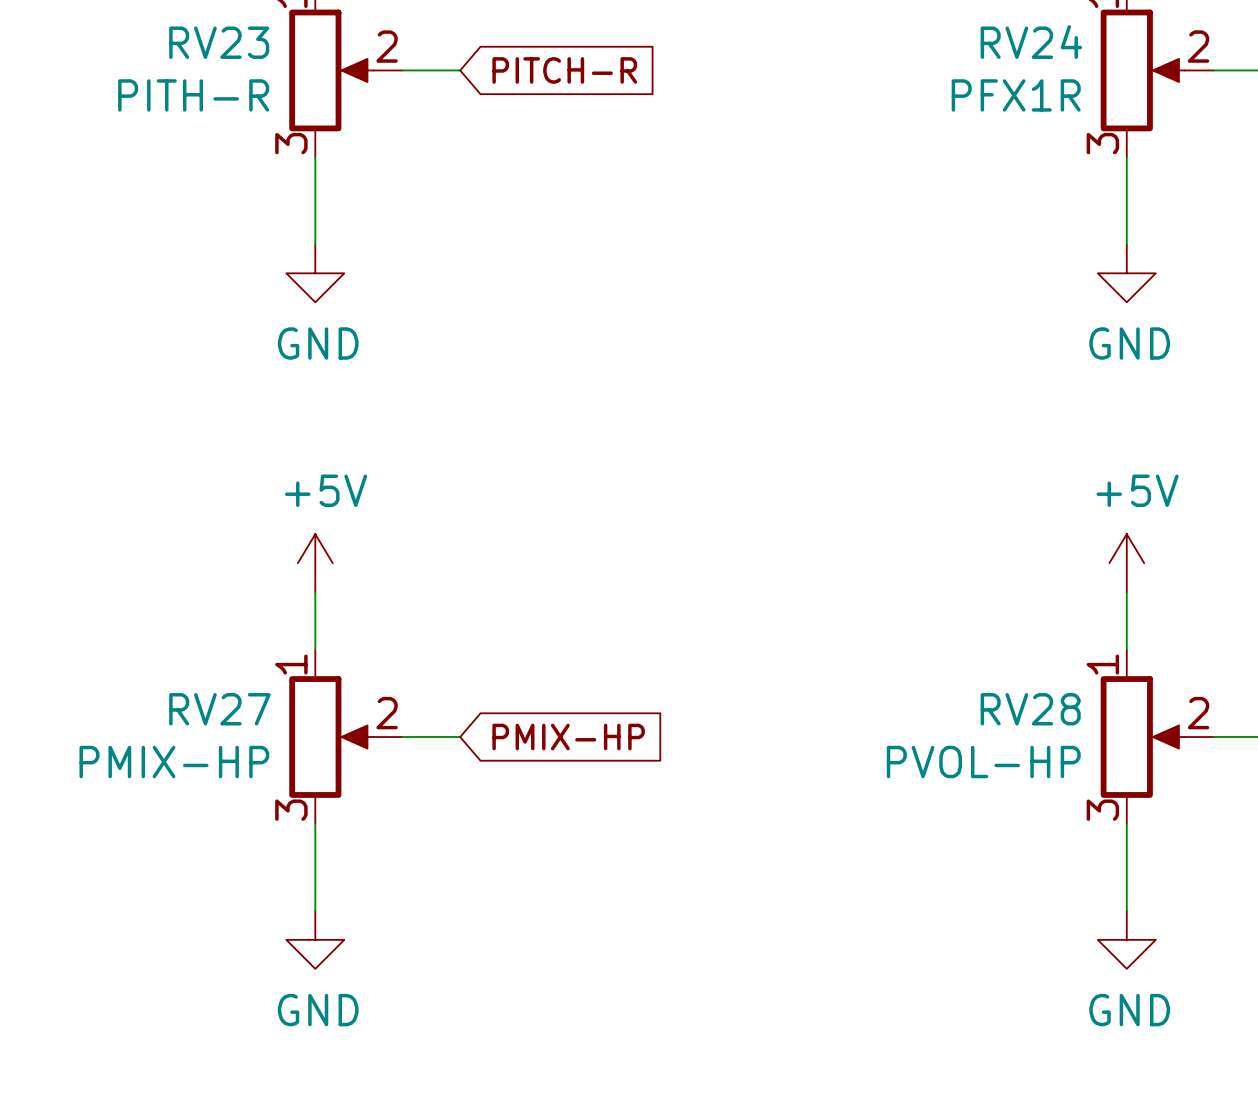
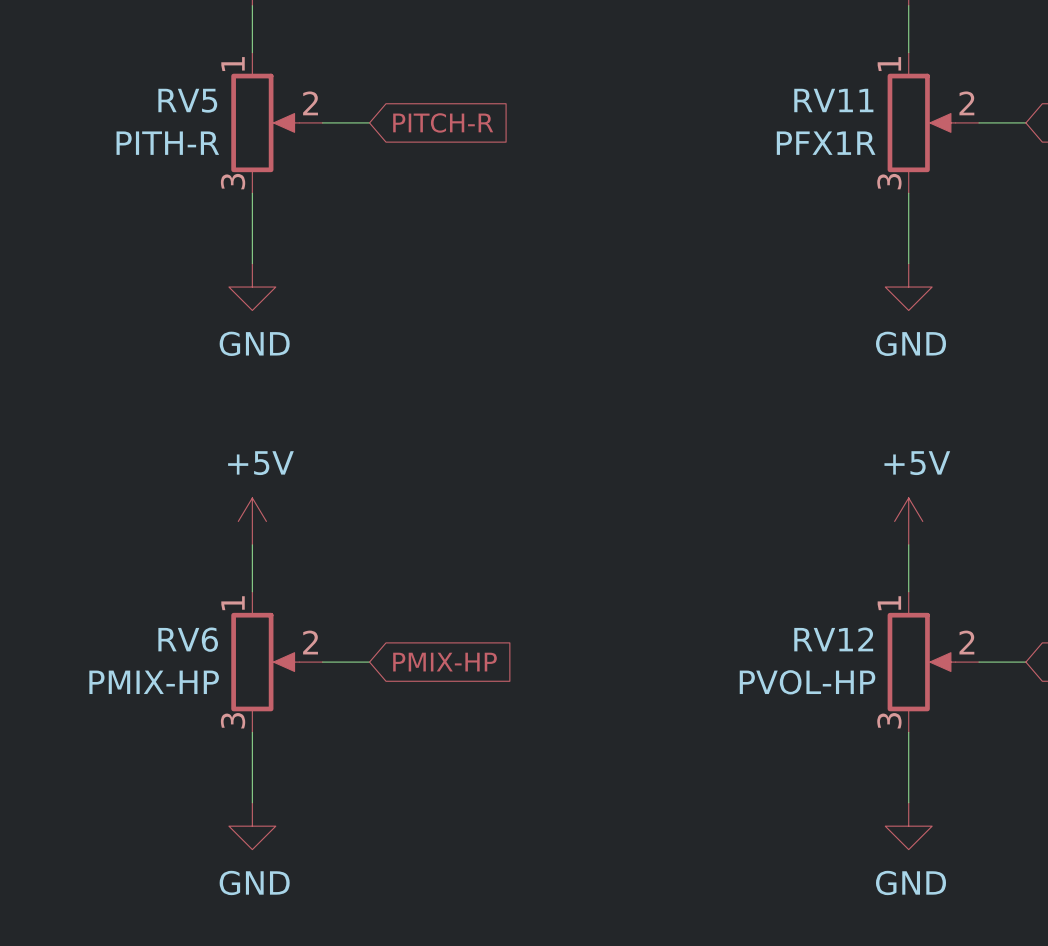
RV23 name: RV23 (219, 42) -> RV5 (187, 100)
RV24 name: RV24 (1031, 42) -> RV11 (833, 100)
RV27 name: RV27 (219, 709) -> RV6 (188, 639)
RV28 name: RV28 (1030, 709) -> RV12 (833, 639)

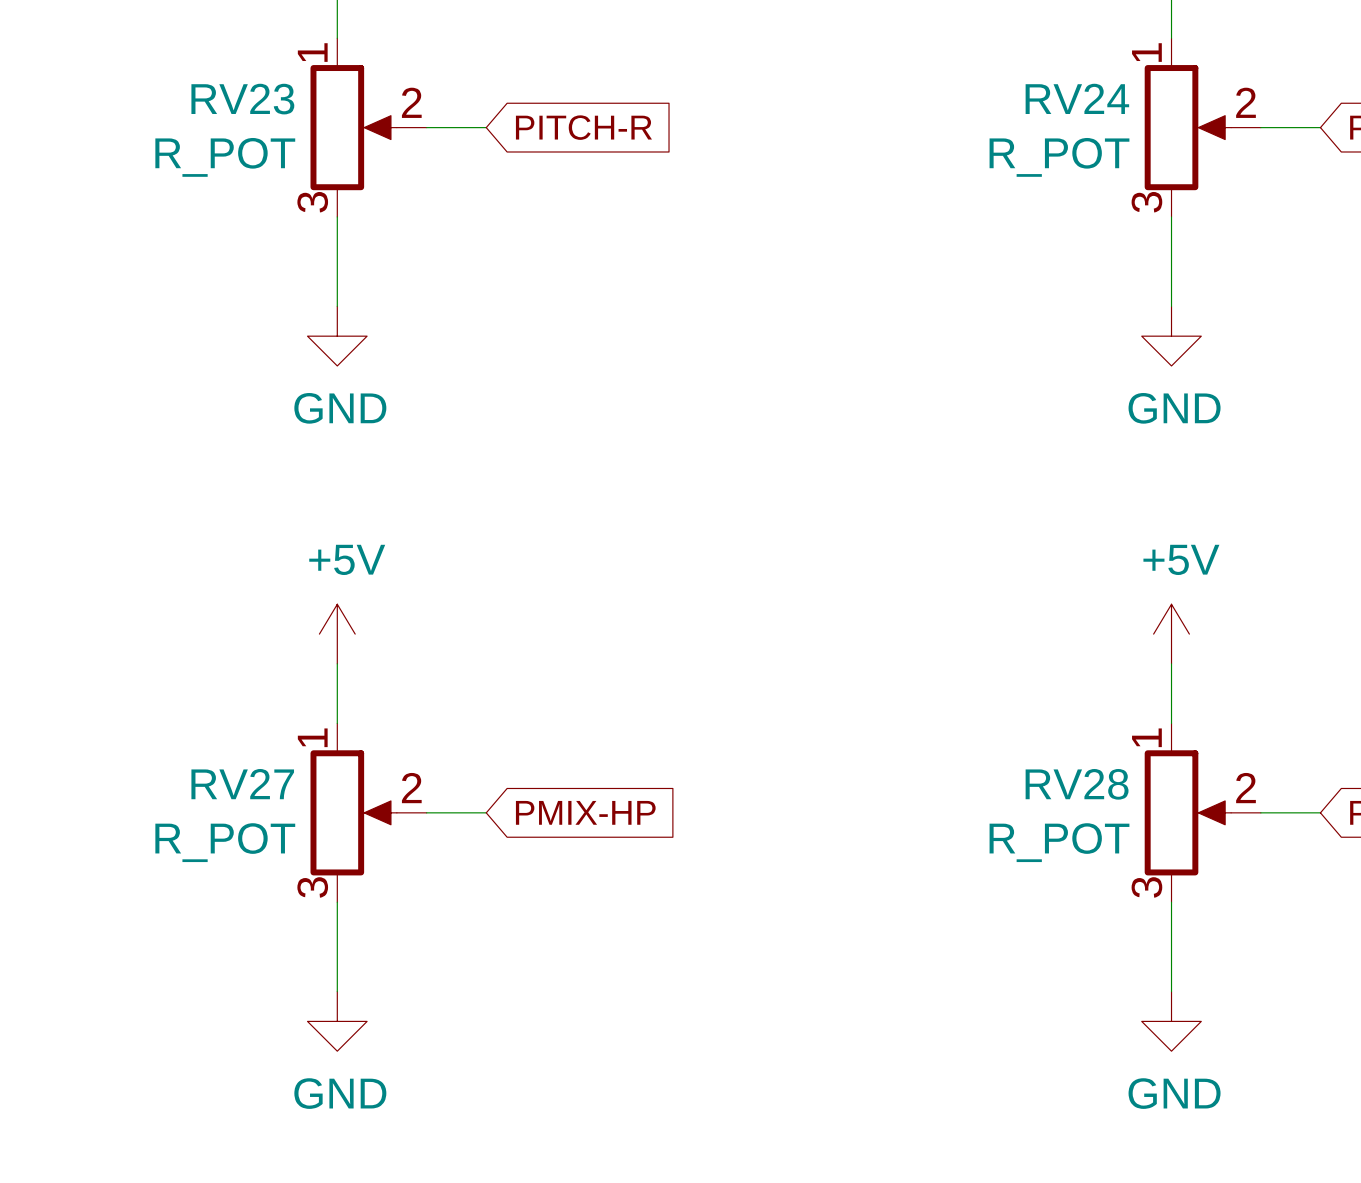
RV5 name: RV5 (187, 100) -> RV23 (242, 99)
RV11 name: RV11 (833, 100) -> RV24 (1077, 98)
RV5 value: PITH-R (167, 143) -> R_POT (225, 157)
RV11 value: PFX1R (826, 143) -> R_POT (1059, 157)
RV6 name: RV6 (188, 639) -> RV27 (242, 784)
RV12 name: RV12 (833, 639) -> RV28 (1077, 784)
RV6 value: PMIX-HP (154, 682) -> R_POT (225, 842)
RV12 value: PVOL-HP (807, 682) -> R_POT (1059, 842)

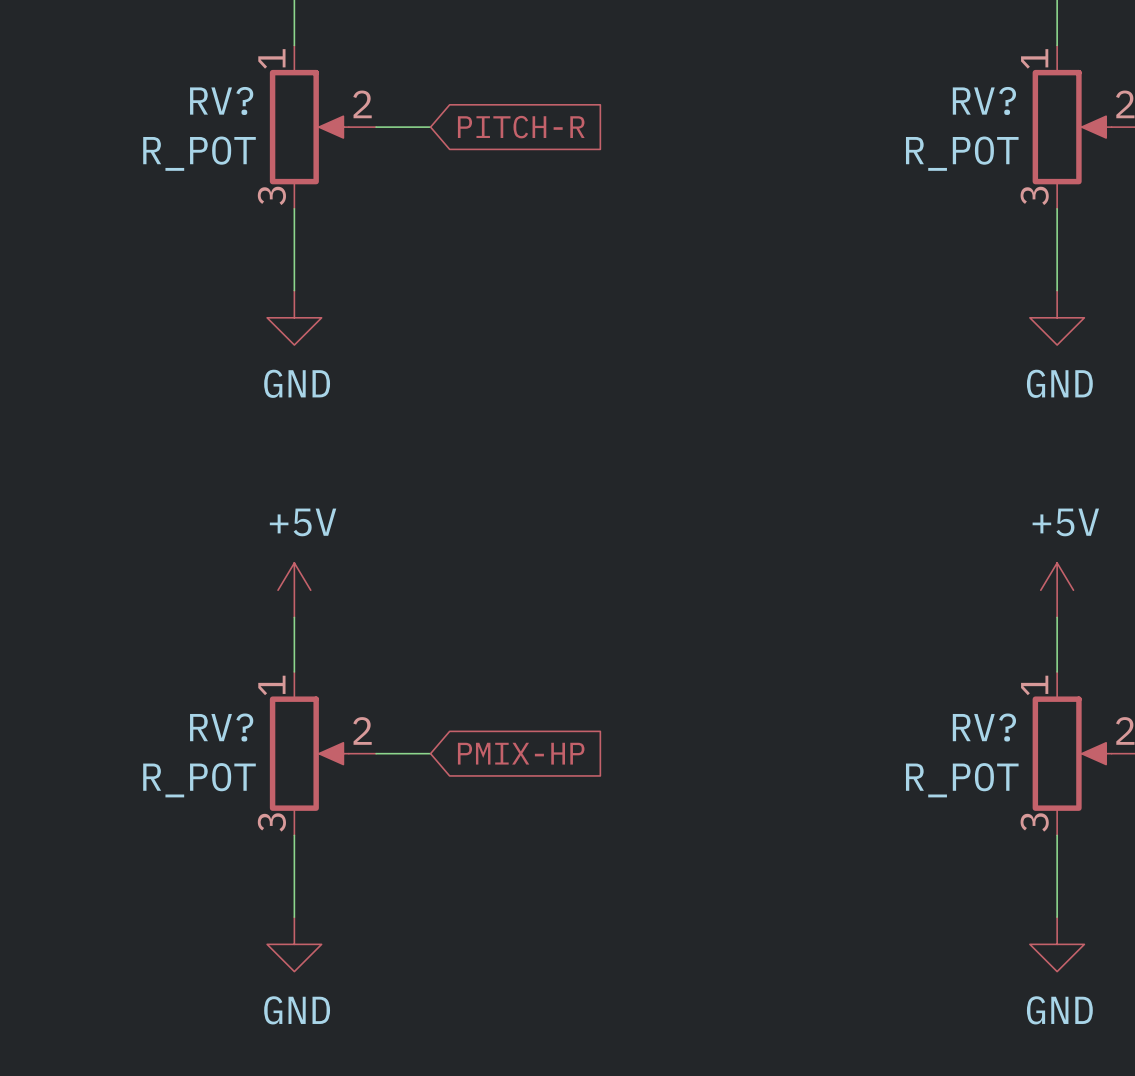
RV24 name: RV24 (1077, 98) -> RV? (984, 100)
RV23 name: RV23 (242, 99) -> RV? (221, 100)
RV27 name: RV27 (242, 784) -> RV? (221, 727)
RV28 name: RV28 (1077, 784) -> RV? (984, 727)

